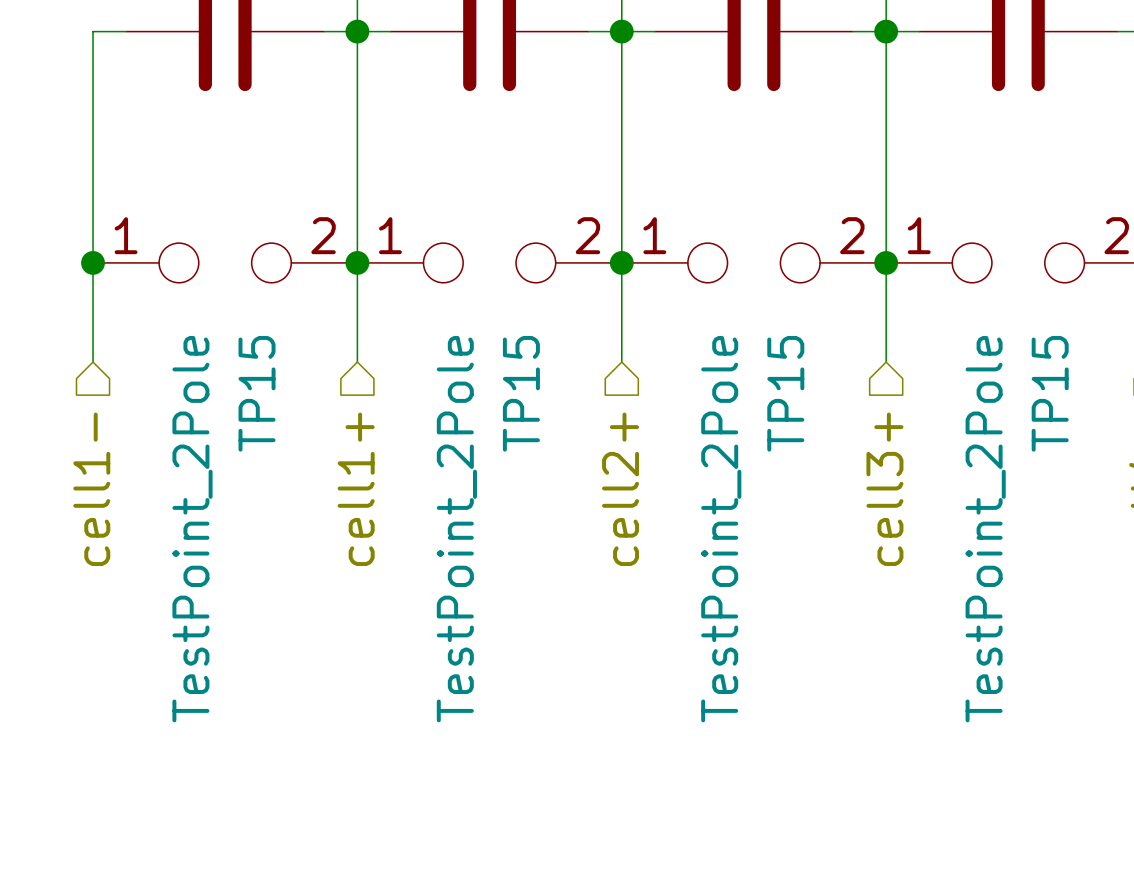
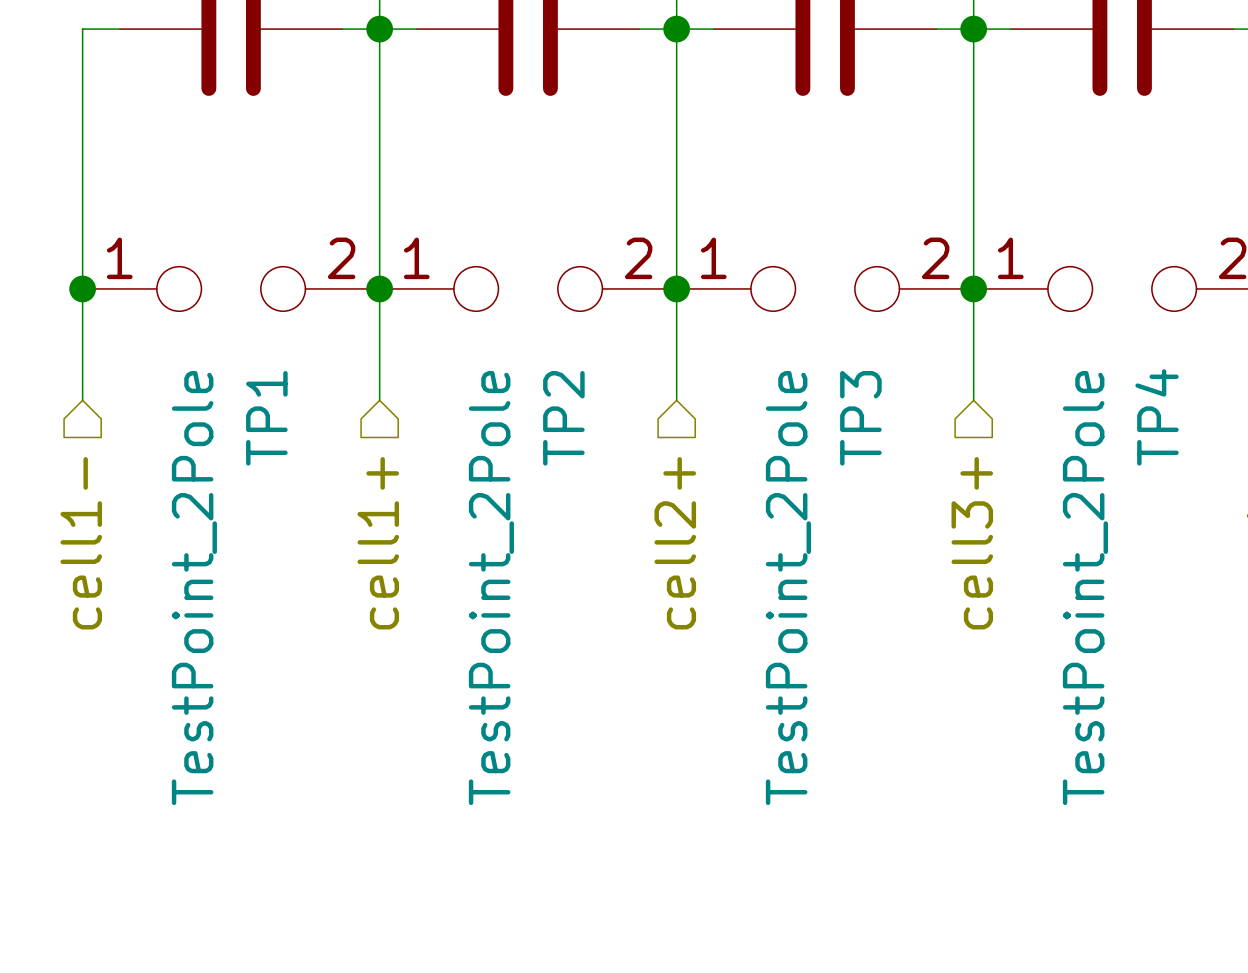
TP15 name: TP15 (257, 393) -> TP1 (266, 418)
TP15 name: TP15 (521, 393) -> TP2 (563, 418)
TP15 name: TP15 (785, 393) -> TP3 (860, 418)
TP15 name: TP15 (1050, 393) -> TP4 (1157, 417)

